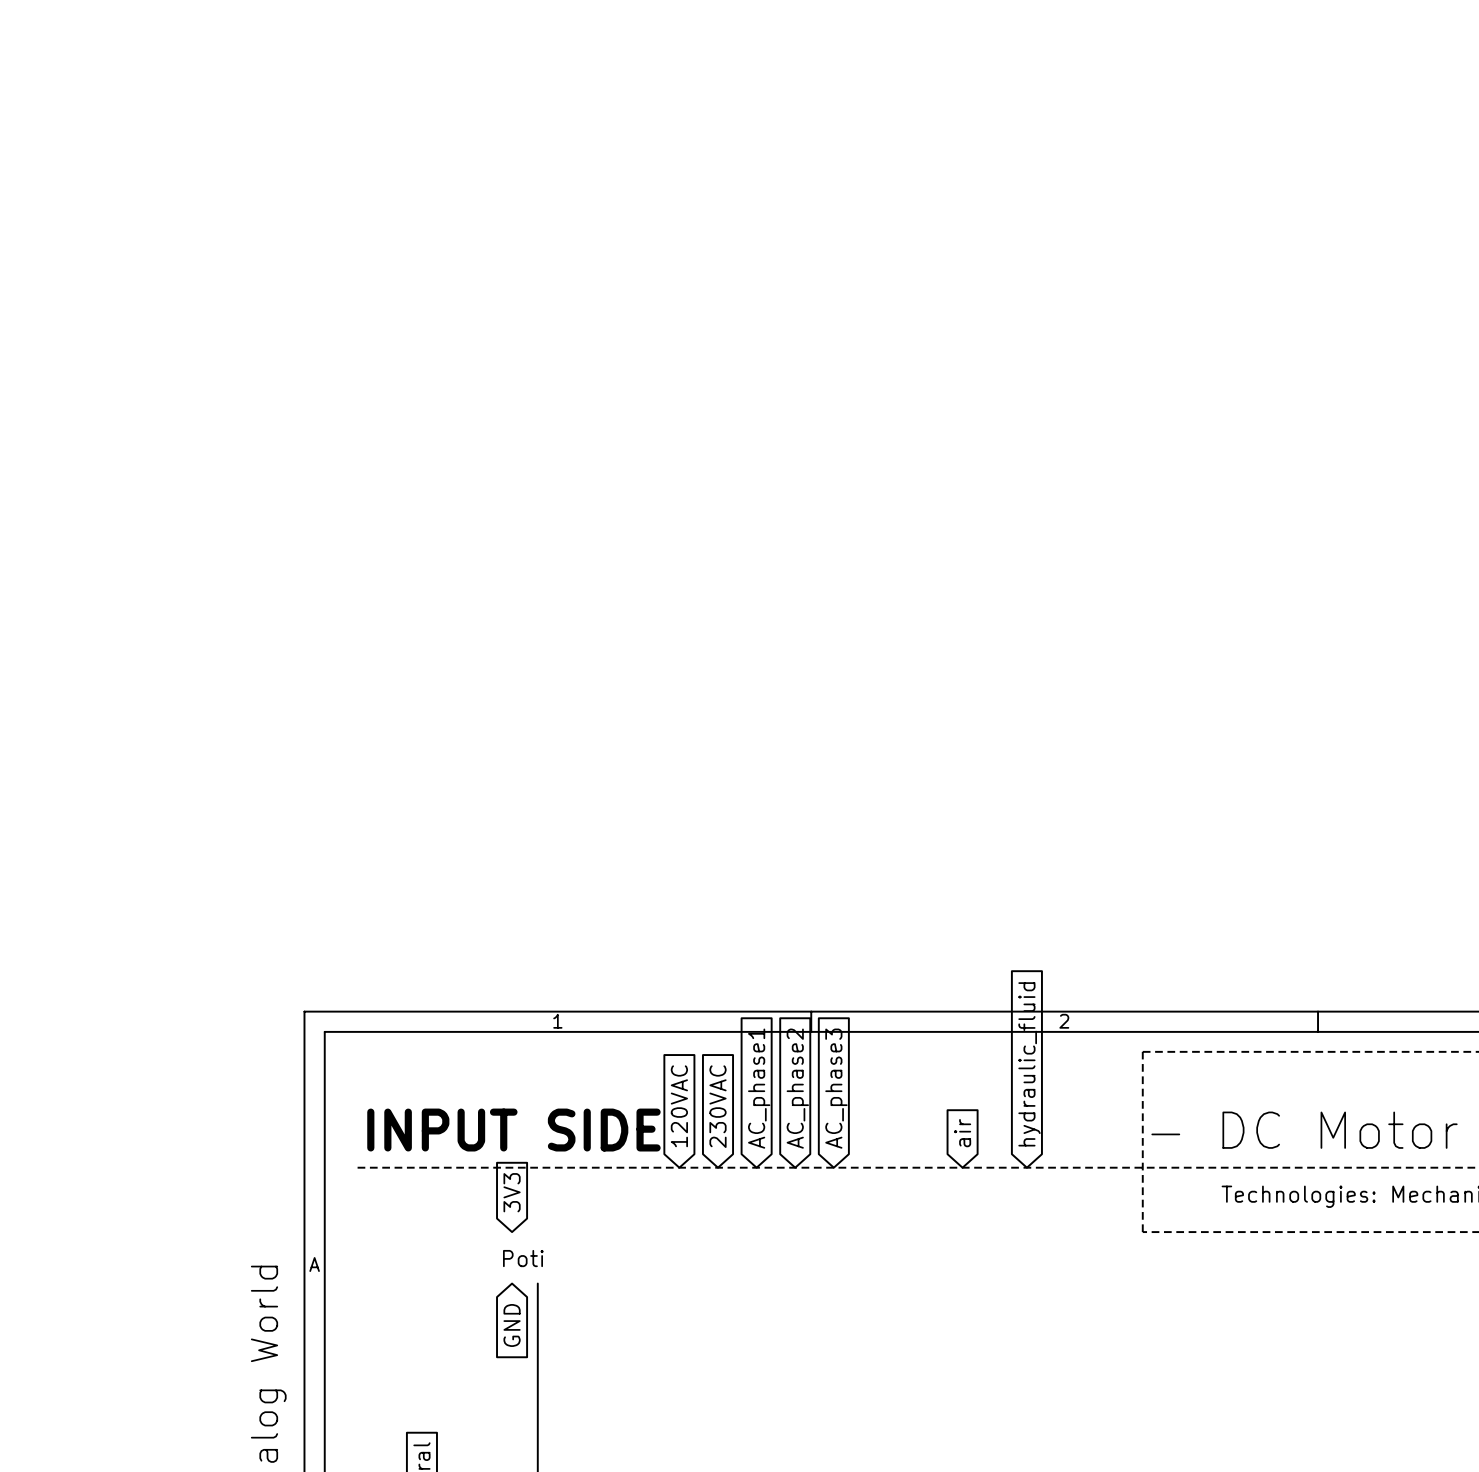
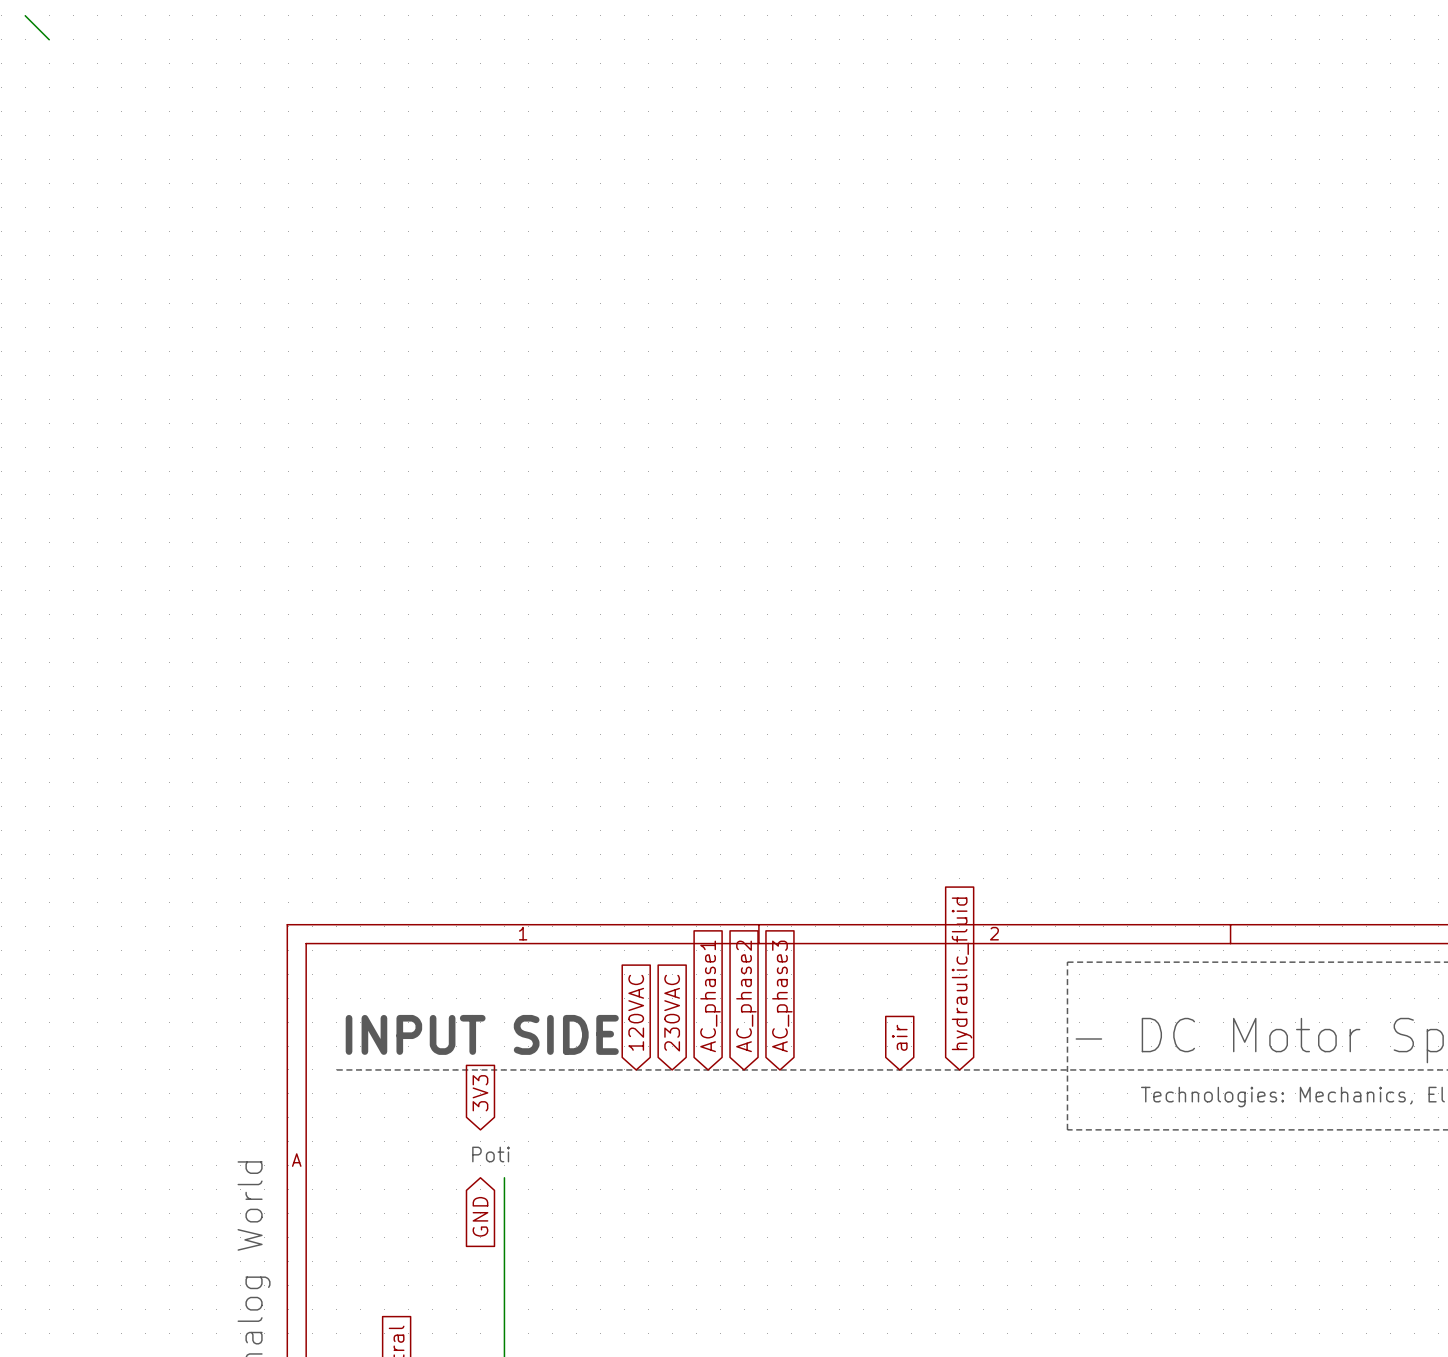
wire: none -> (25, 15) (49, 39)

